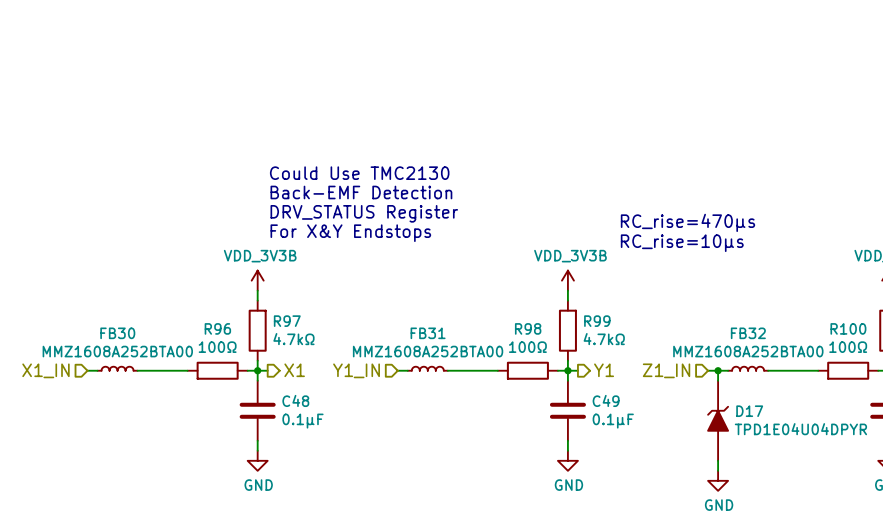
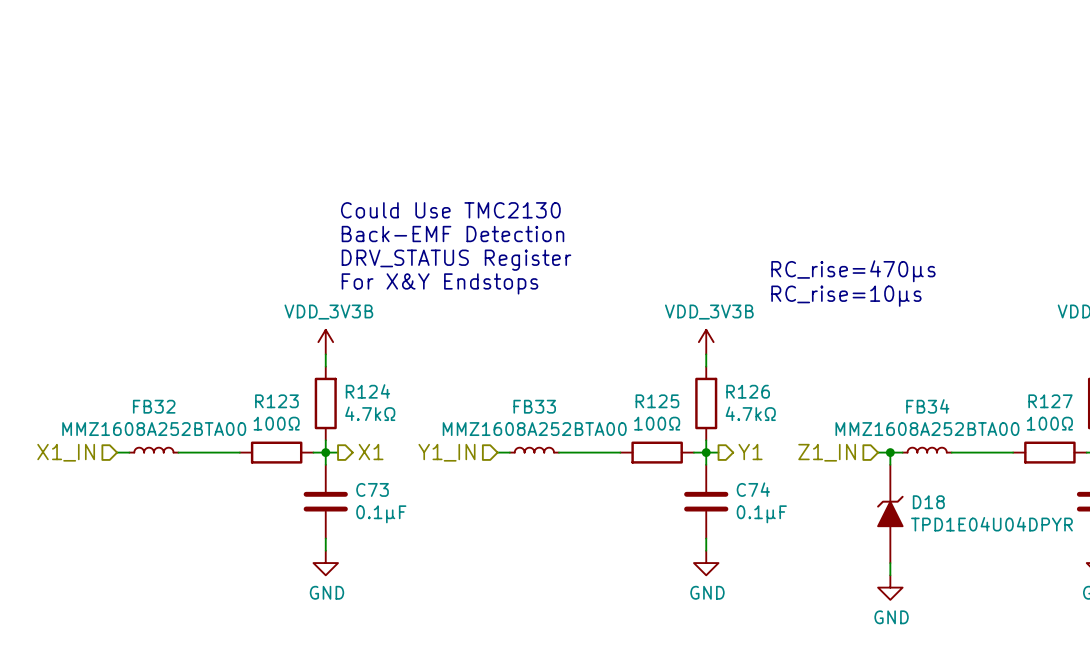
R97 name: R97 (287, 321) -> R124 (367, 391)
R99 name: R99 (597, 321) -> R126 (748, 391)
R96 name: R96 (217, 328) -> R123 (276, 401)
R98 name: R98 (528, 328) -> R125 (657, 401)
R100 name: R100 (848, 328) -> R127 (1050, 401)
FB30 name: FB30 (117, 333) -> FB32 (154, 406)
FB31 name: FB31 (428, 333) -> FB33 (534, 406)
FB32 name: FB32 (748, 333) -> FB34 (927, 406)
C48 name: C48 (295, 400) -> C73 (372, 489)
C49 name: C49 (606, 400) -> C74 (753, 489)
D17 name: D17 (749, 411) -> D18 (928, 502)

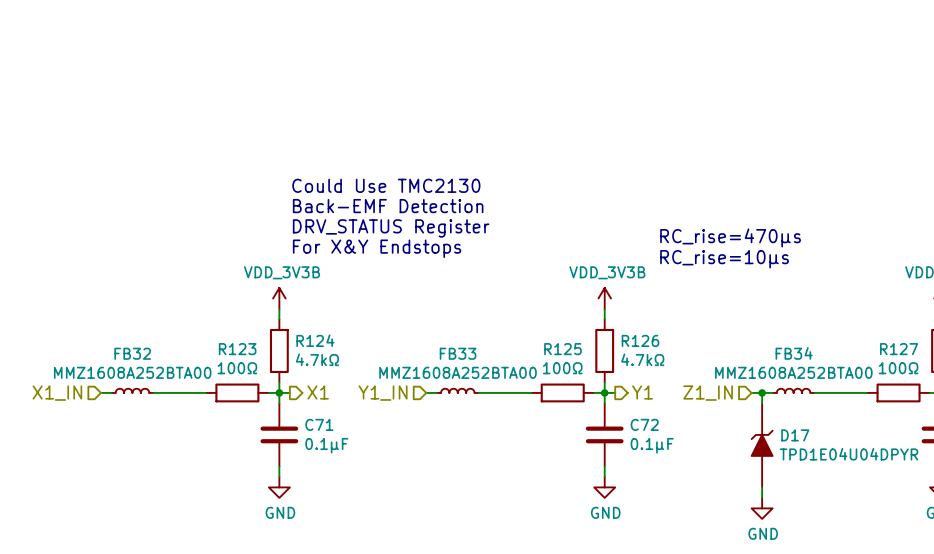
C73 name: C73 (372, 489) -> C71 (319, 424)
C74 name: C74 (753, 489) -> C72 (644, 424)
D18 name: D18 (928, 502) -> D17 (795, 435)

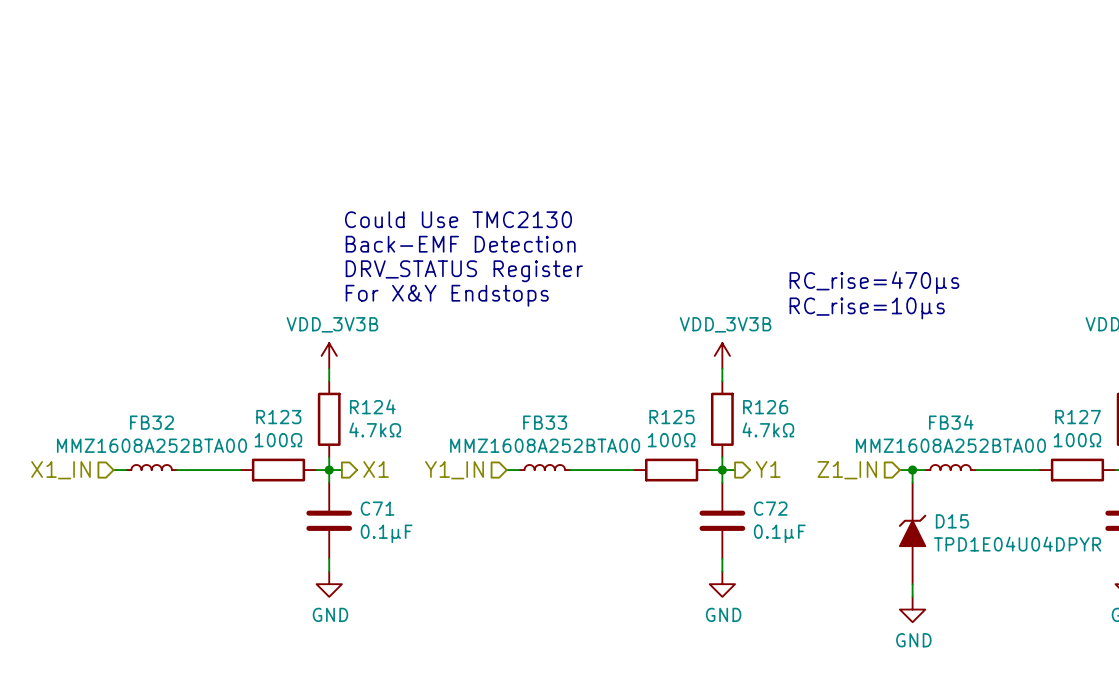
D17 name: D17 (795, 435) -> D15 (952, 521)

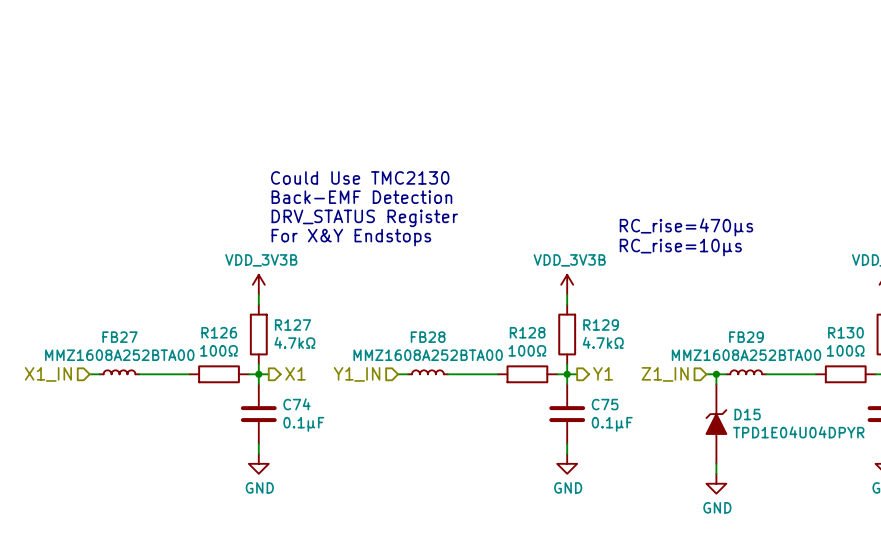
R124 name: R124 (372, 406) -> R127 (292, 324)
R126 name: R126 (765, 407) -> R129 (601, 324)
R123 name: R123 (278, 417) -> R126 (219, 332)
R125 name: R125 (671, 417) -> R128 (527, 332)
R127 name: R127 (1078, 417) -> R130 (845, 332)
FB32 name: FB32 (151, 422) -> FB27 (120, 337)
FB33 name: FB33 (545, 422) -> FB28 (428, 337)
FB34 name: FB34 (951, 422) -> FB29 (746, 337)
C71 name: C71 (377, 508) -> C74 (296, 404)
C72 name: C72 (770, 508) -> C75 (605, 404)

